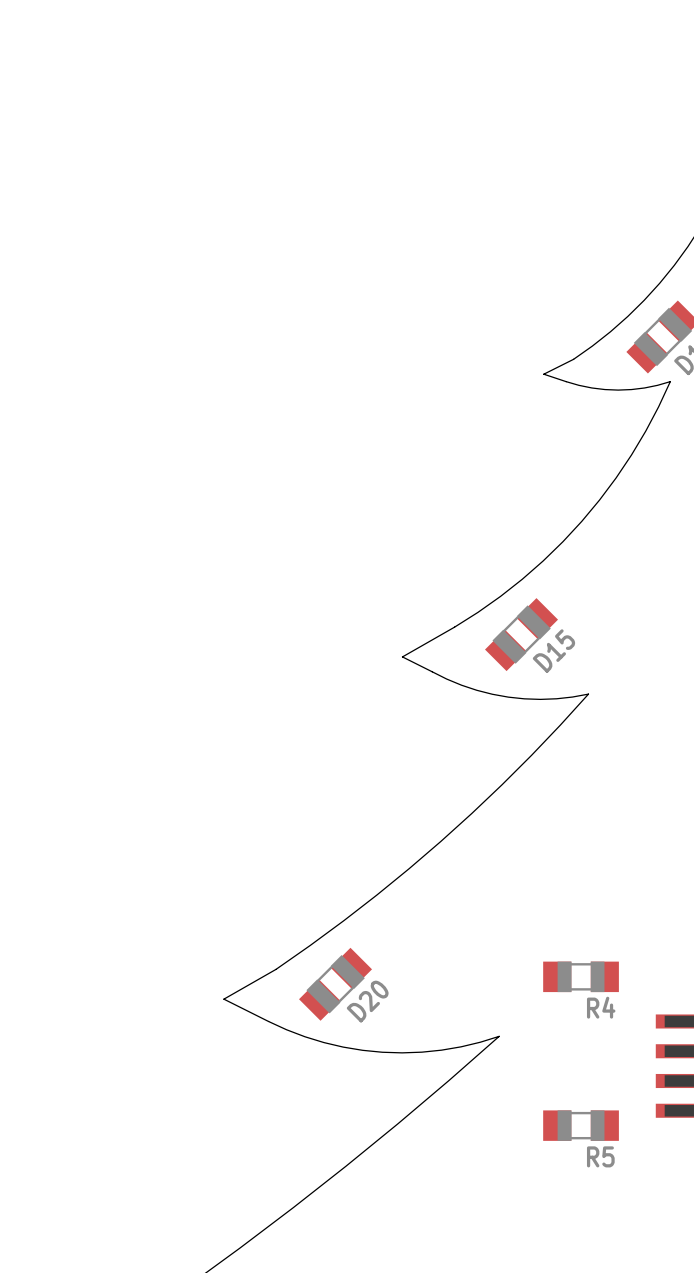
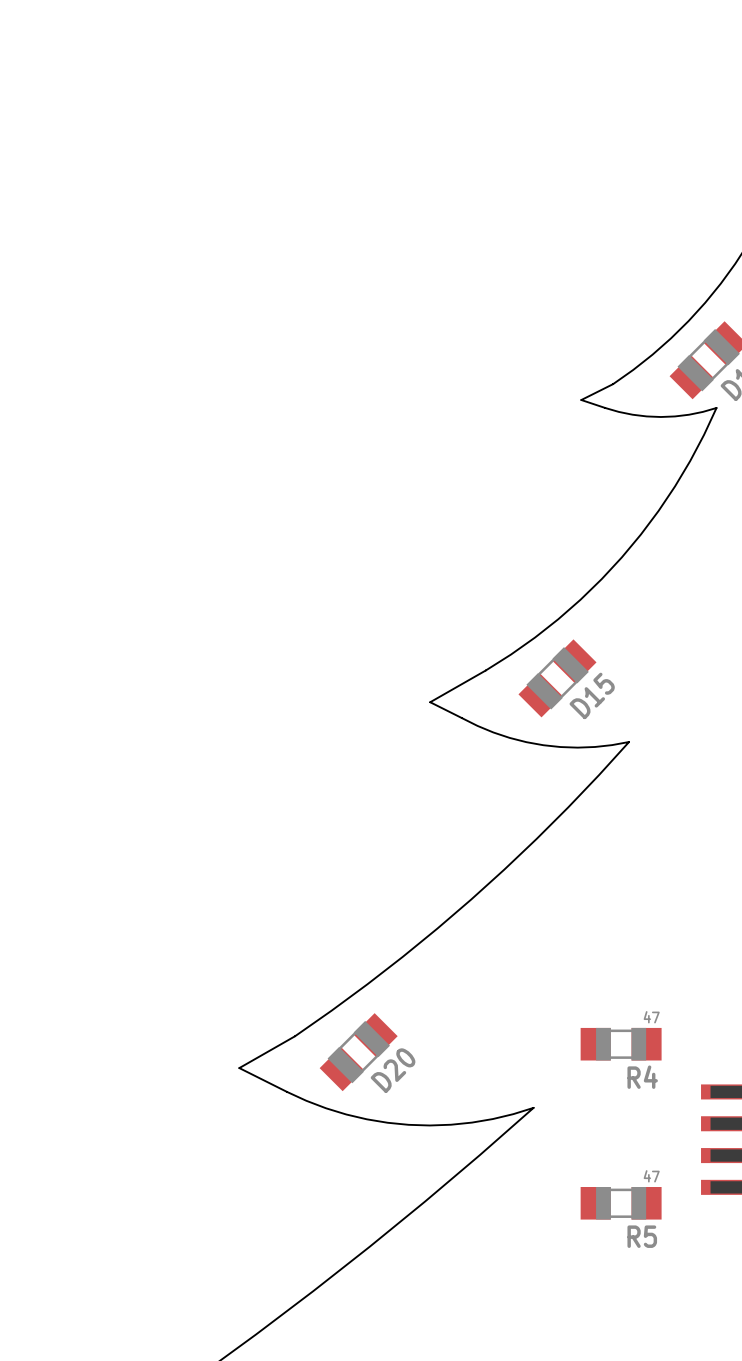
R4 value: none -> 47 (651, 1017)
R5 value: none -> 47 (651, 1176)

